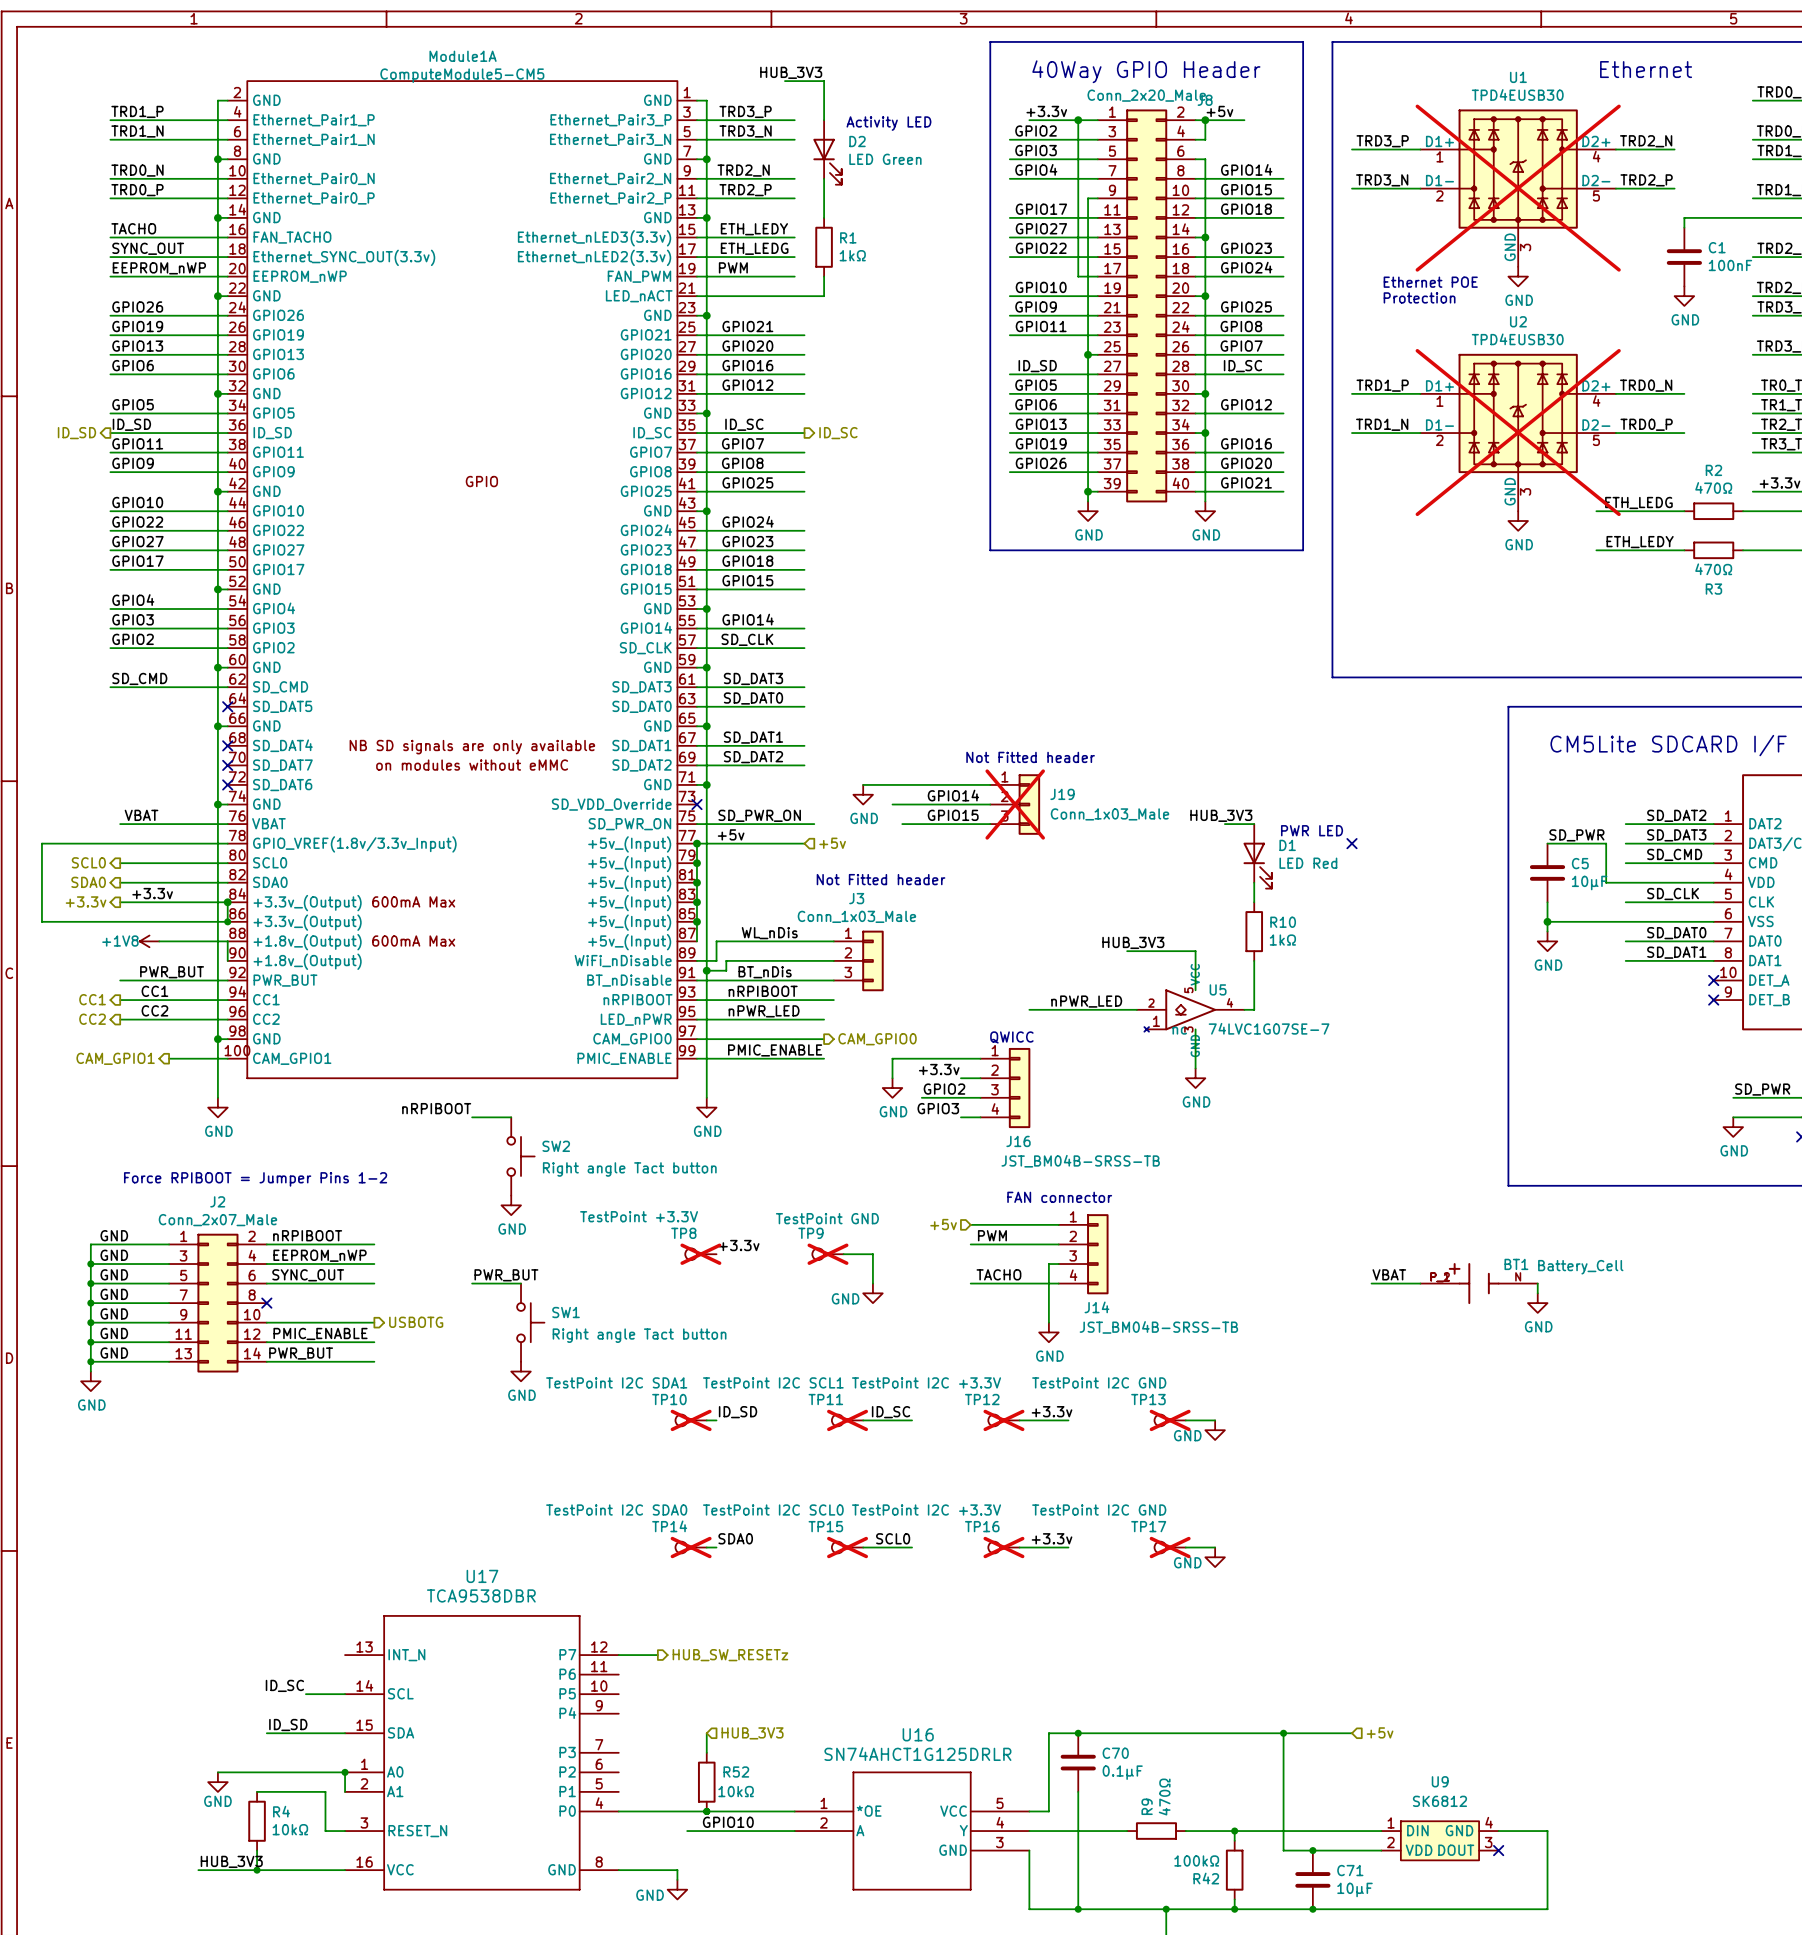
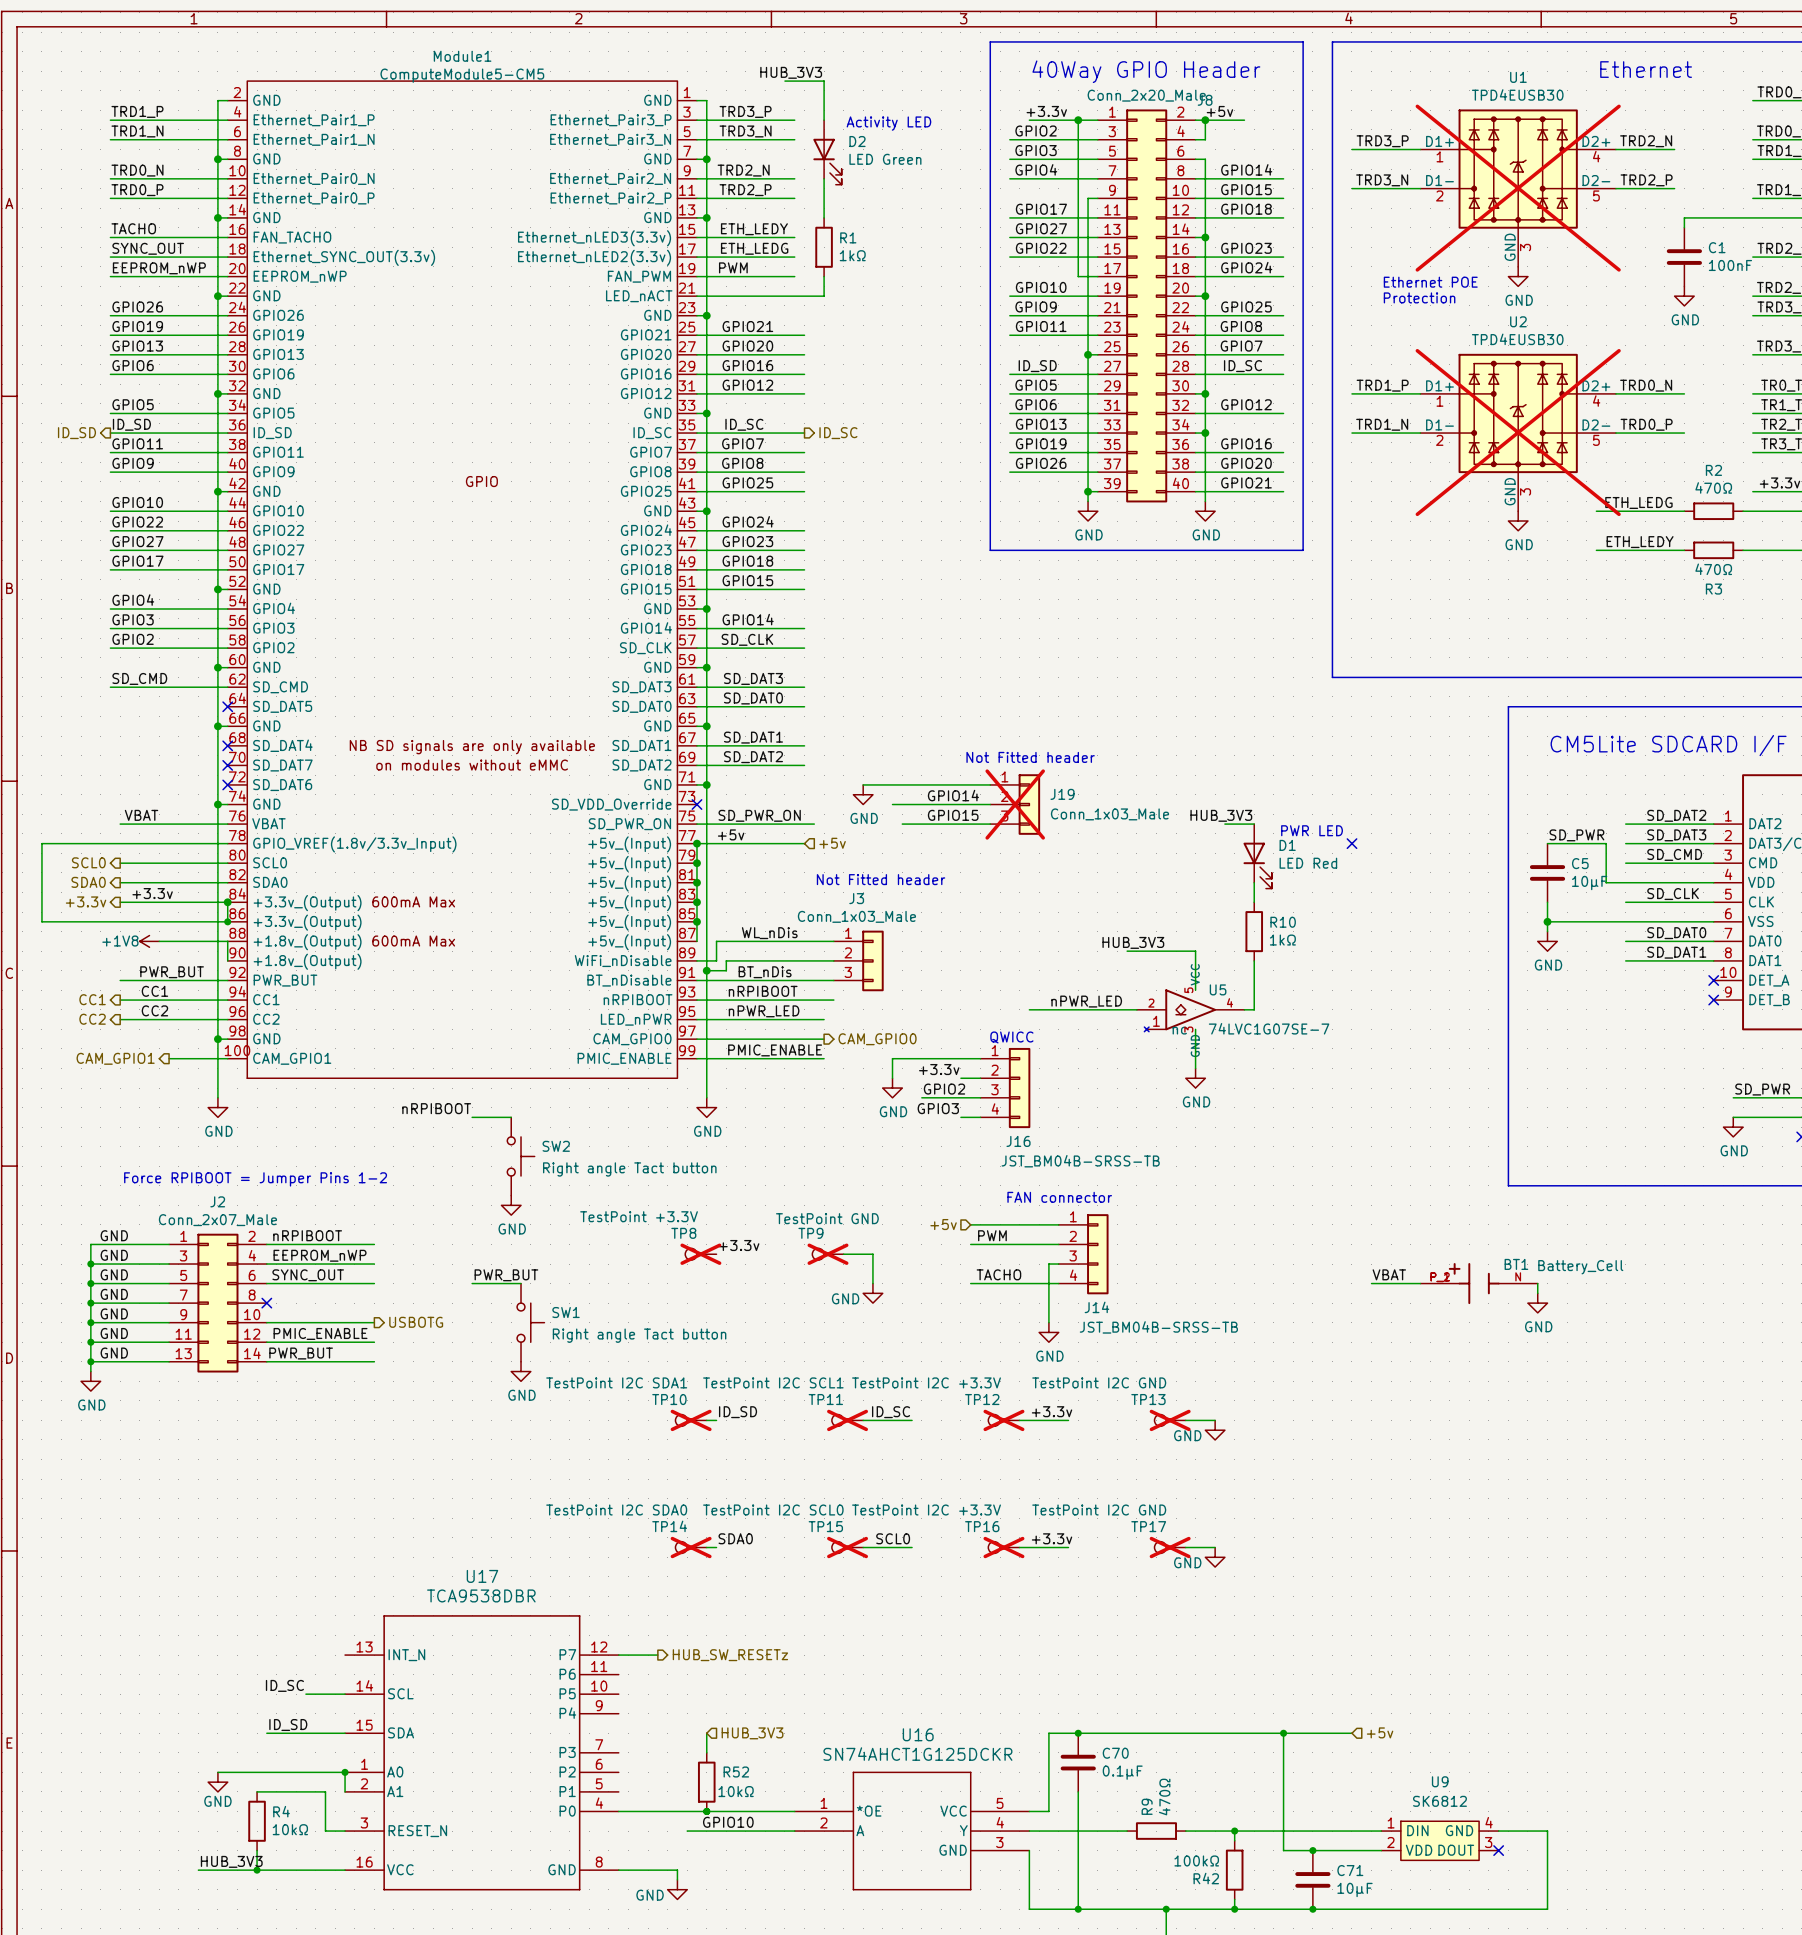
Module1A name: Module1A (463, 56) -> Module1 (462, 56)
U16 value: SN74AHCT1G125DRLR (917, 1754) -> SN74AHCT1G125DCKR (917, 1754)

